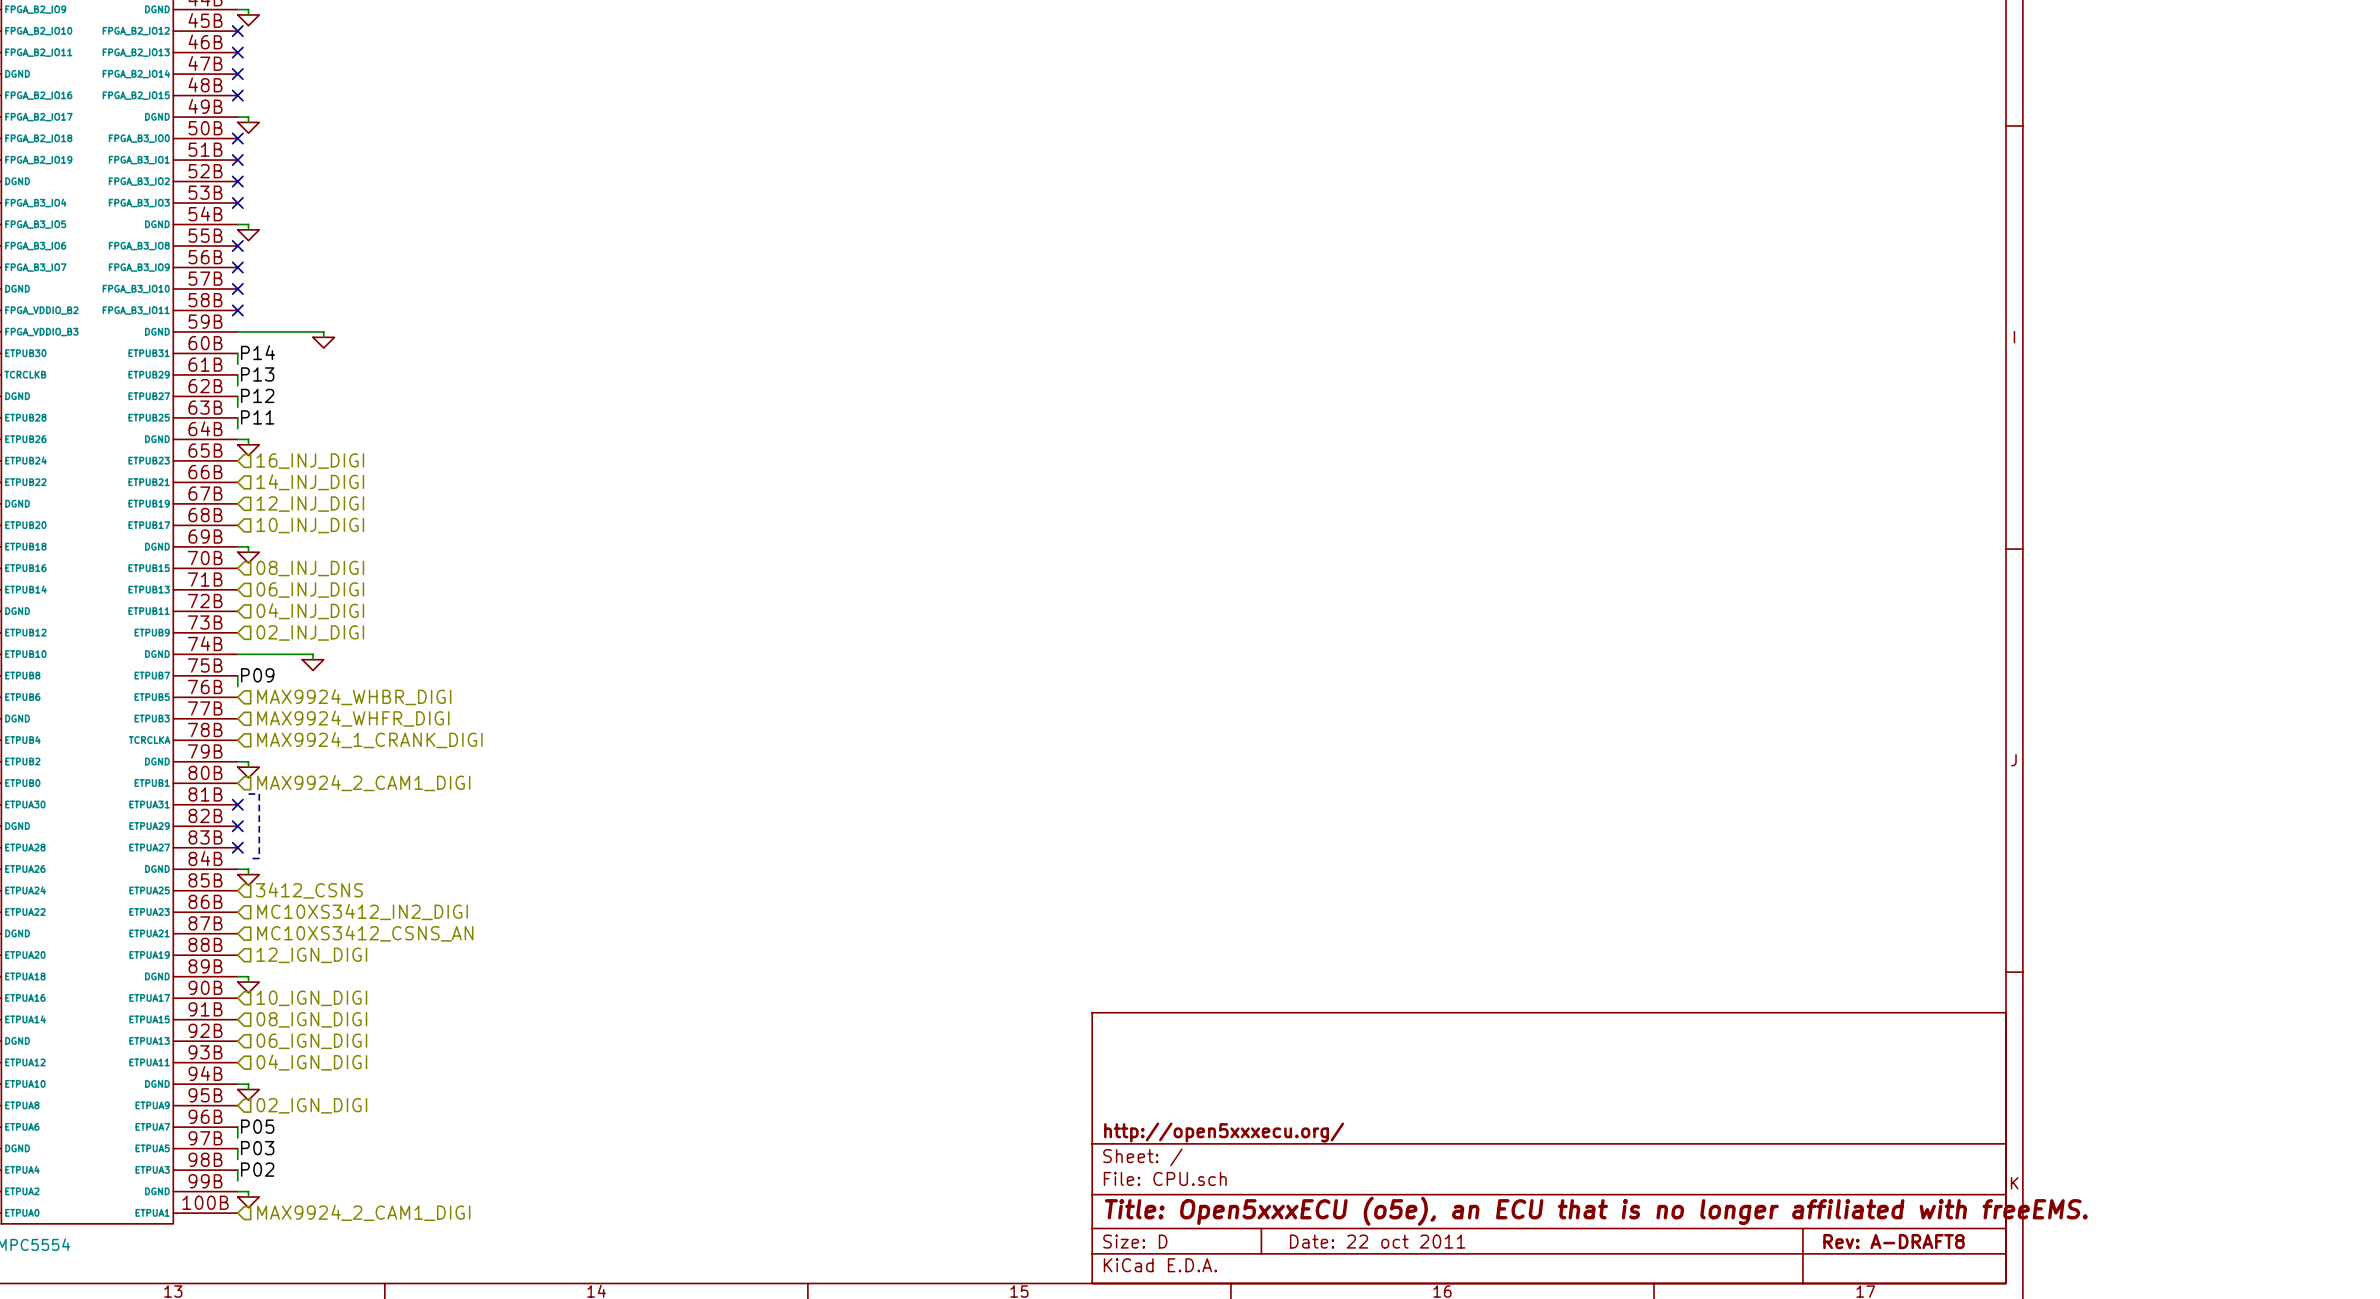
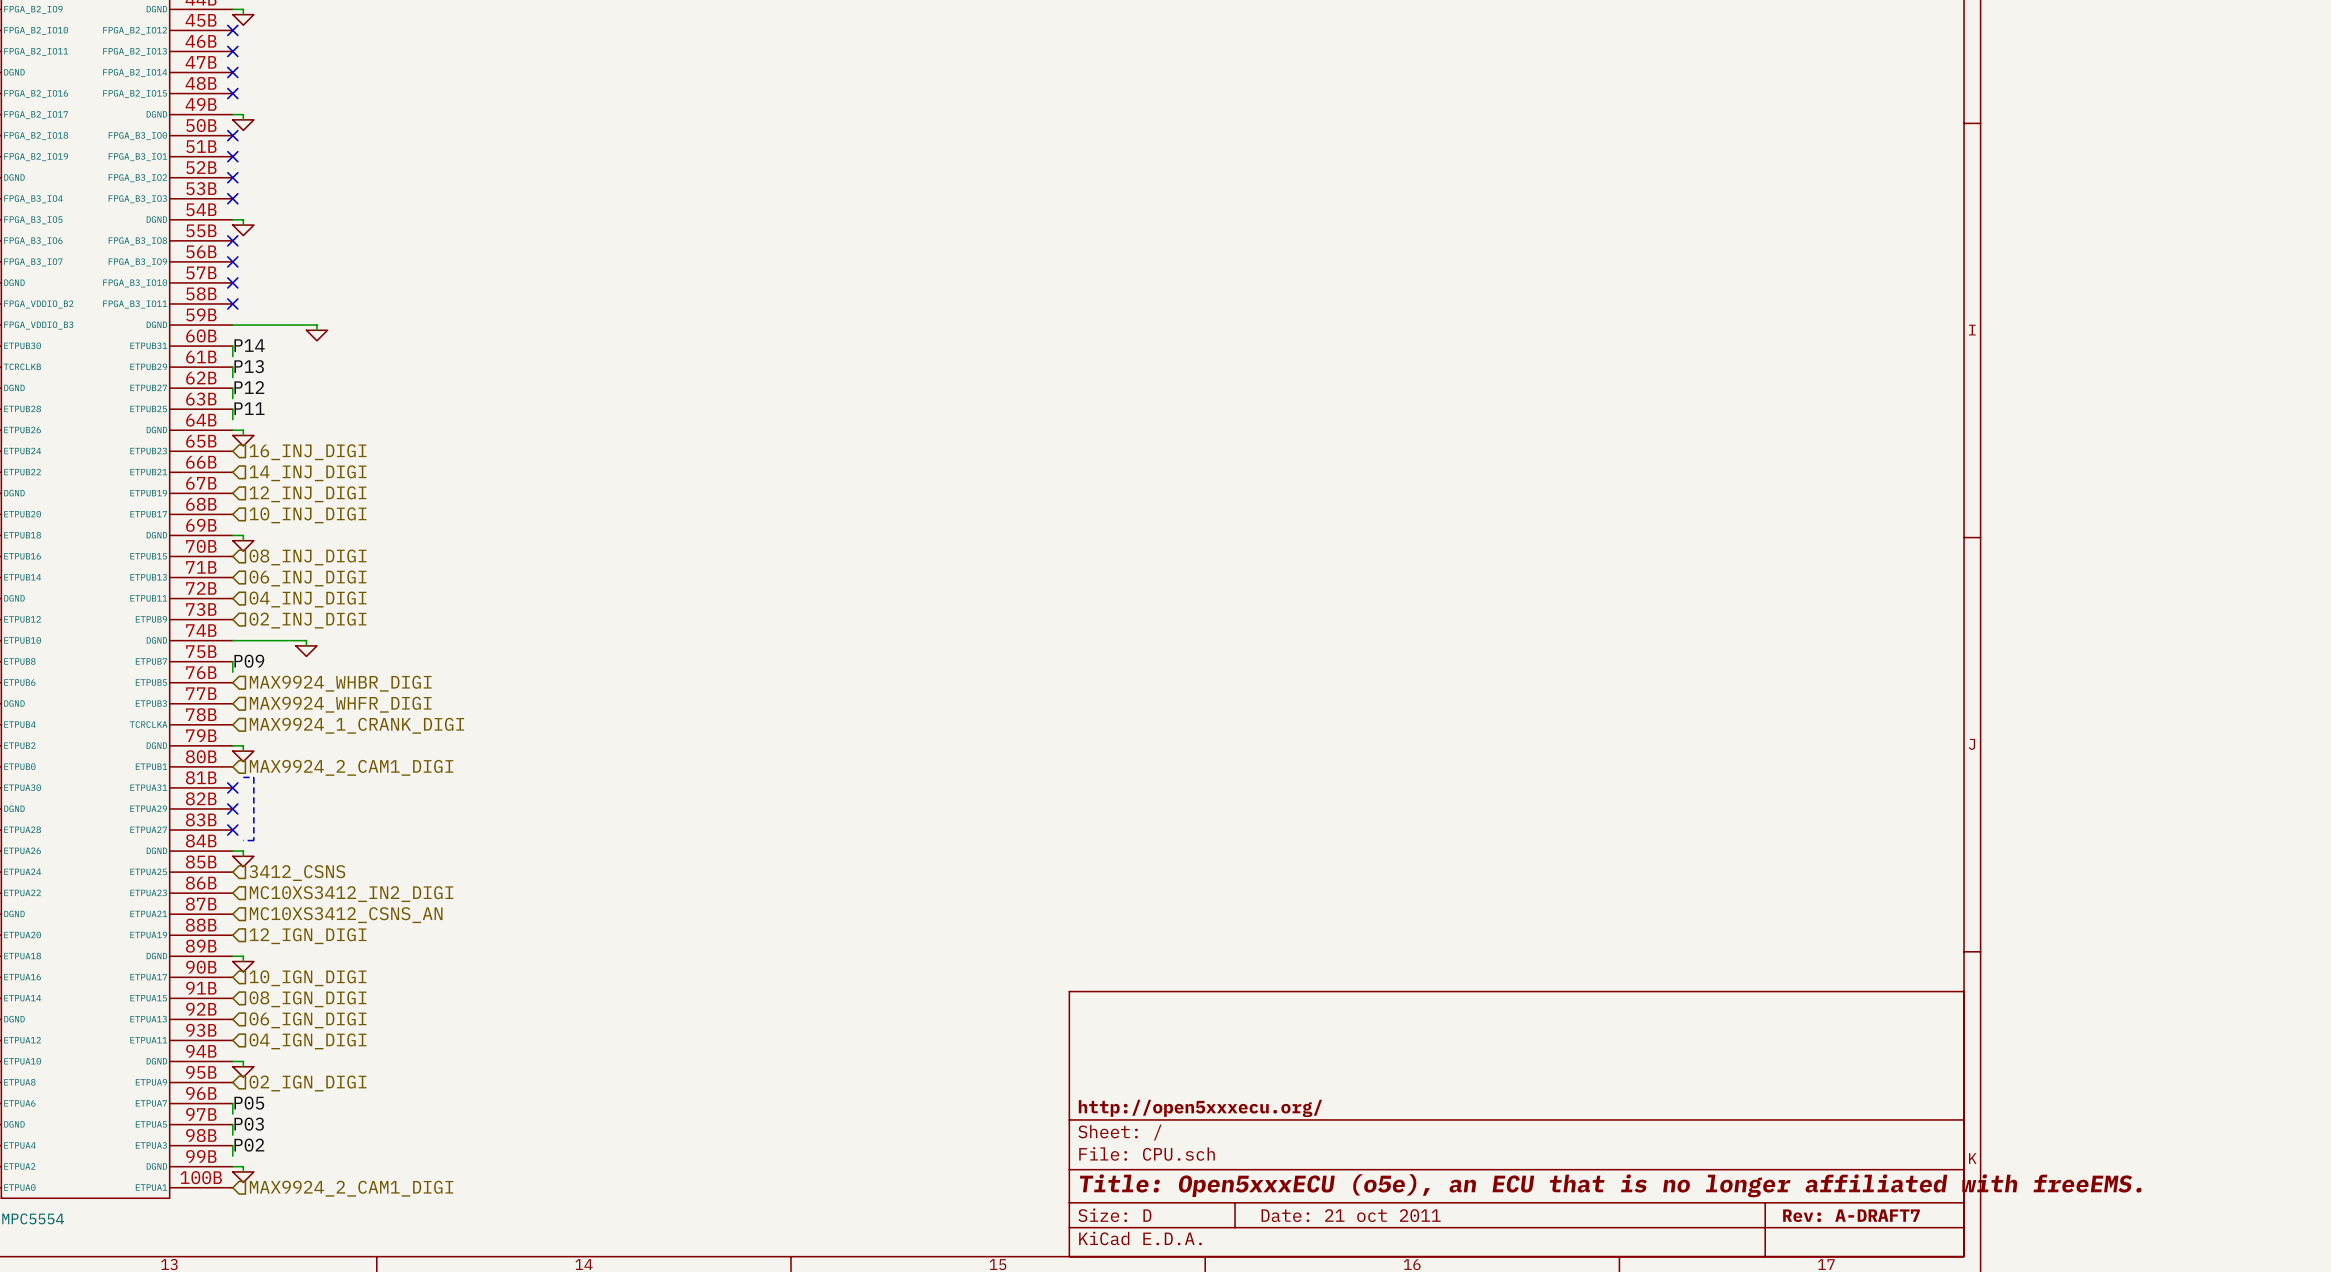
title block: Date: 22 oct 2011 (1377, 1241) -> Date: 21 oct 2011 (1351, 1215)
title block: Rev: A-DRAFT8 (1894, 1241) -> Rev: A-DRAFT7 (1851, 1215)

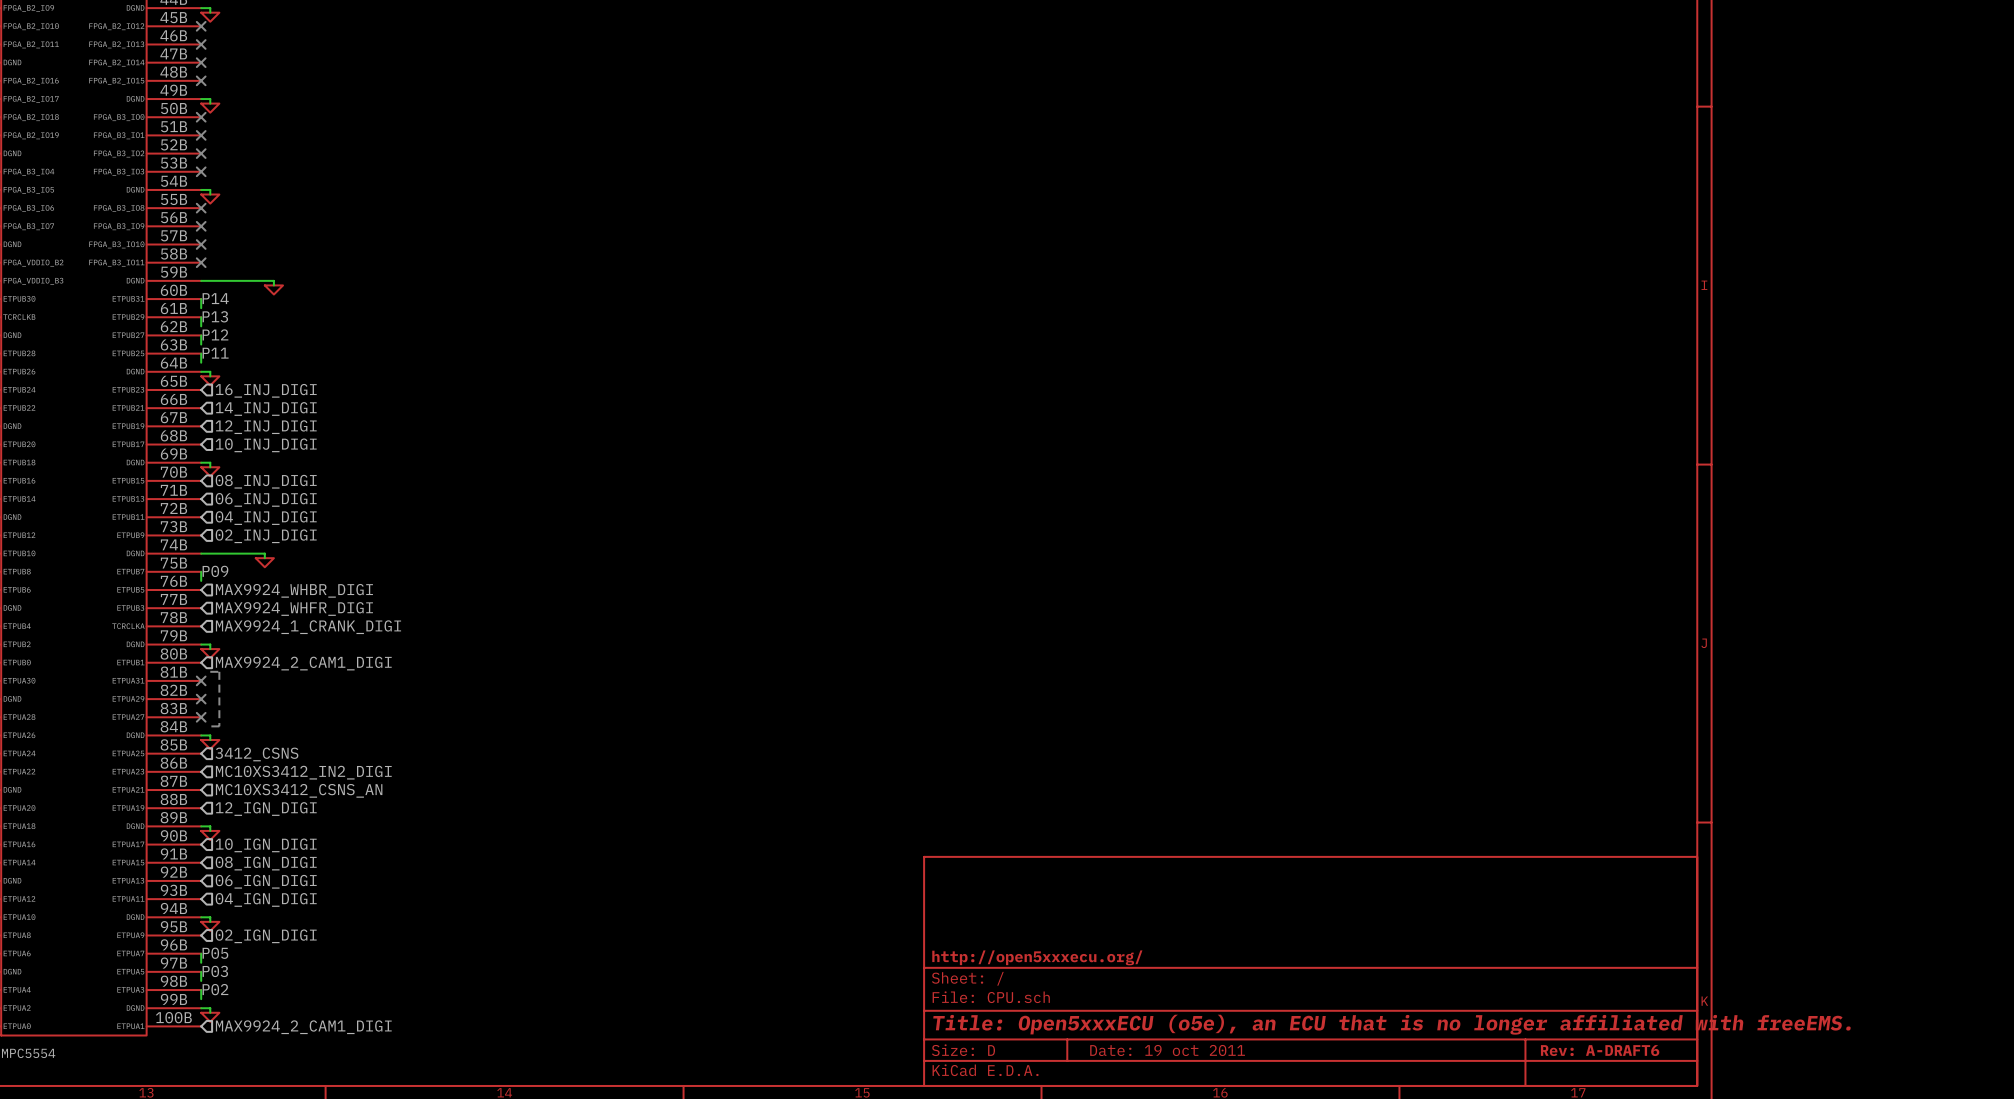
title block: Date: 21 oct 2011 (1351, 1215) -> Date: 19 oct 2011 (1167, 1050)
title block: Rev: A-DRAFT7 (1851, 1215) -> Rev: A-DRAFT6 (1600, 1050)

